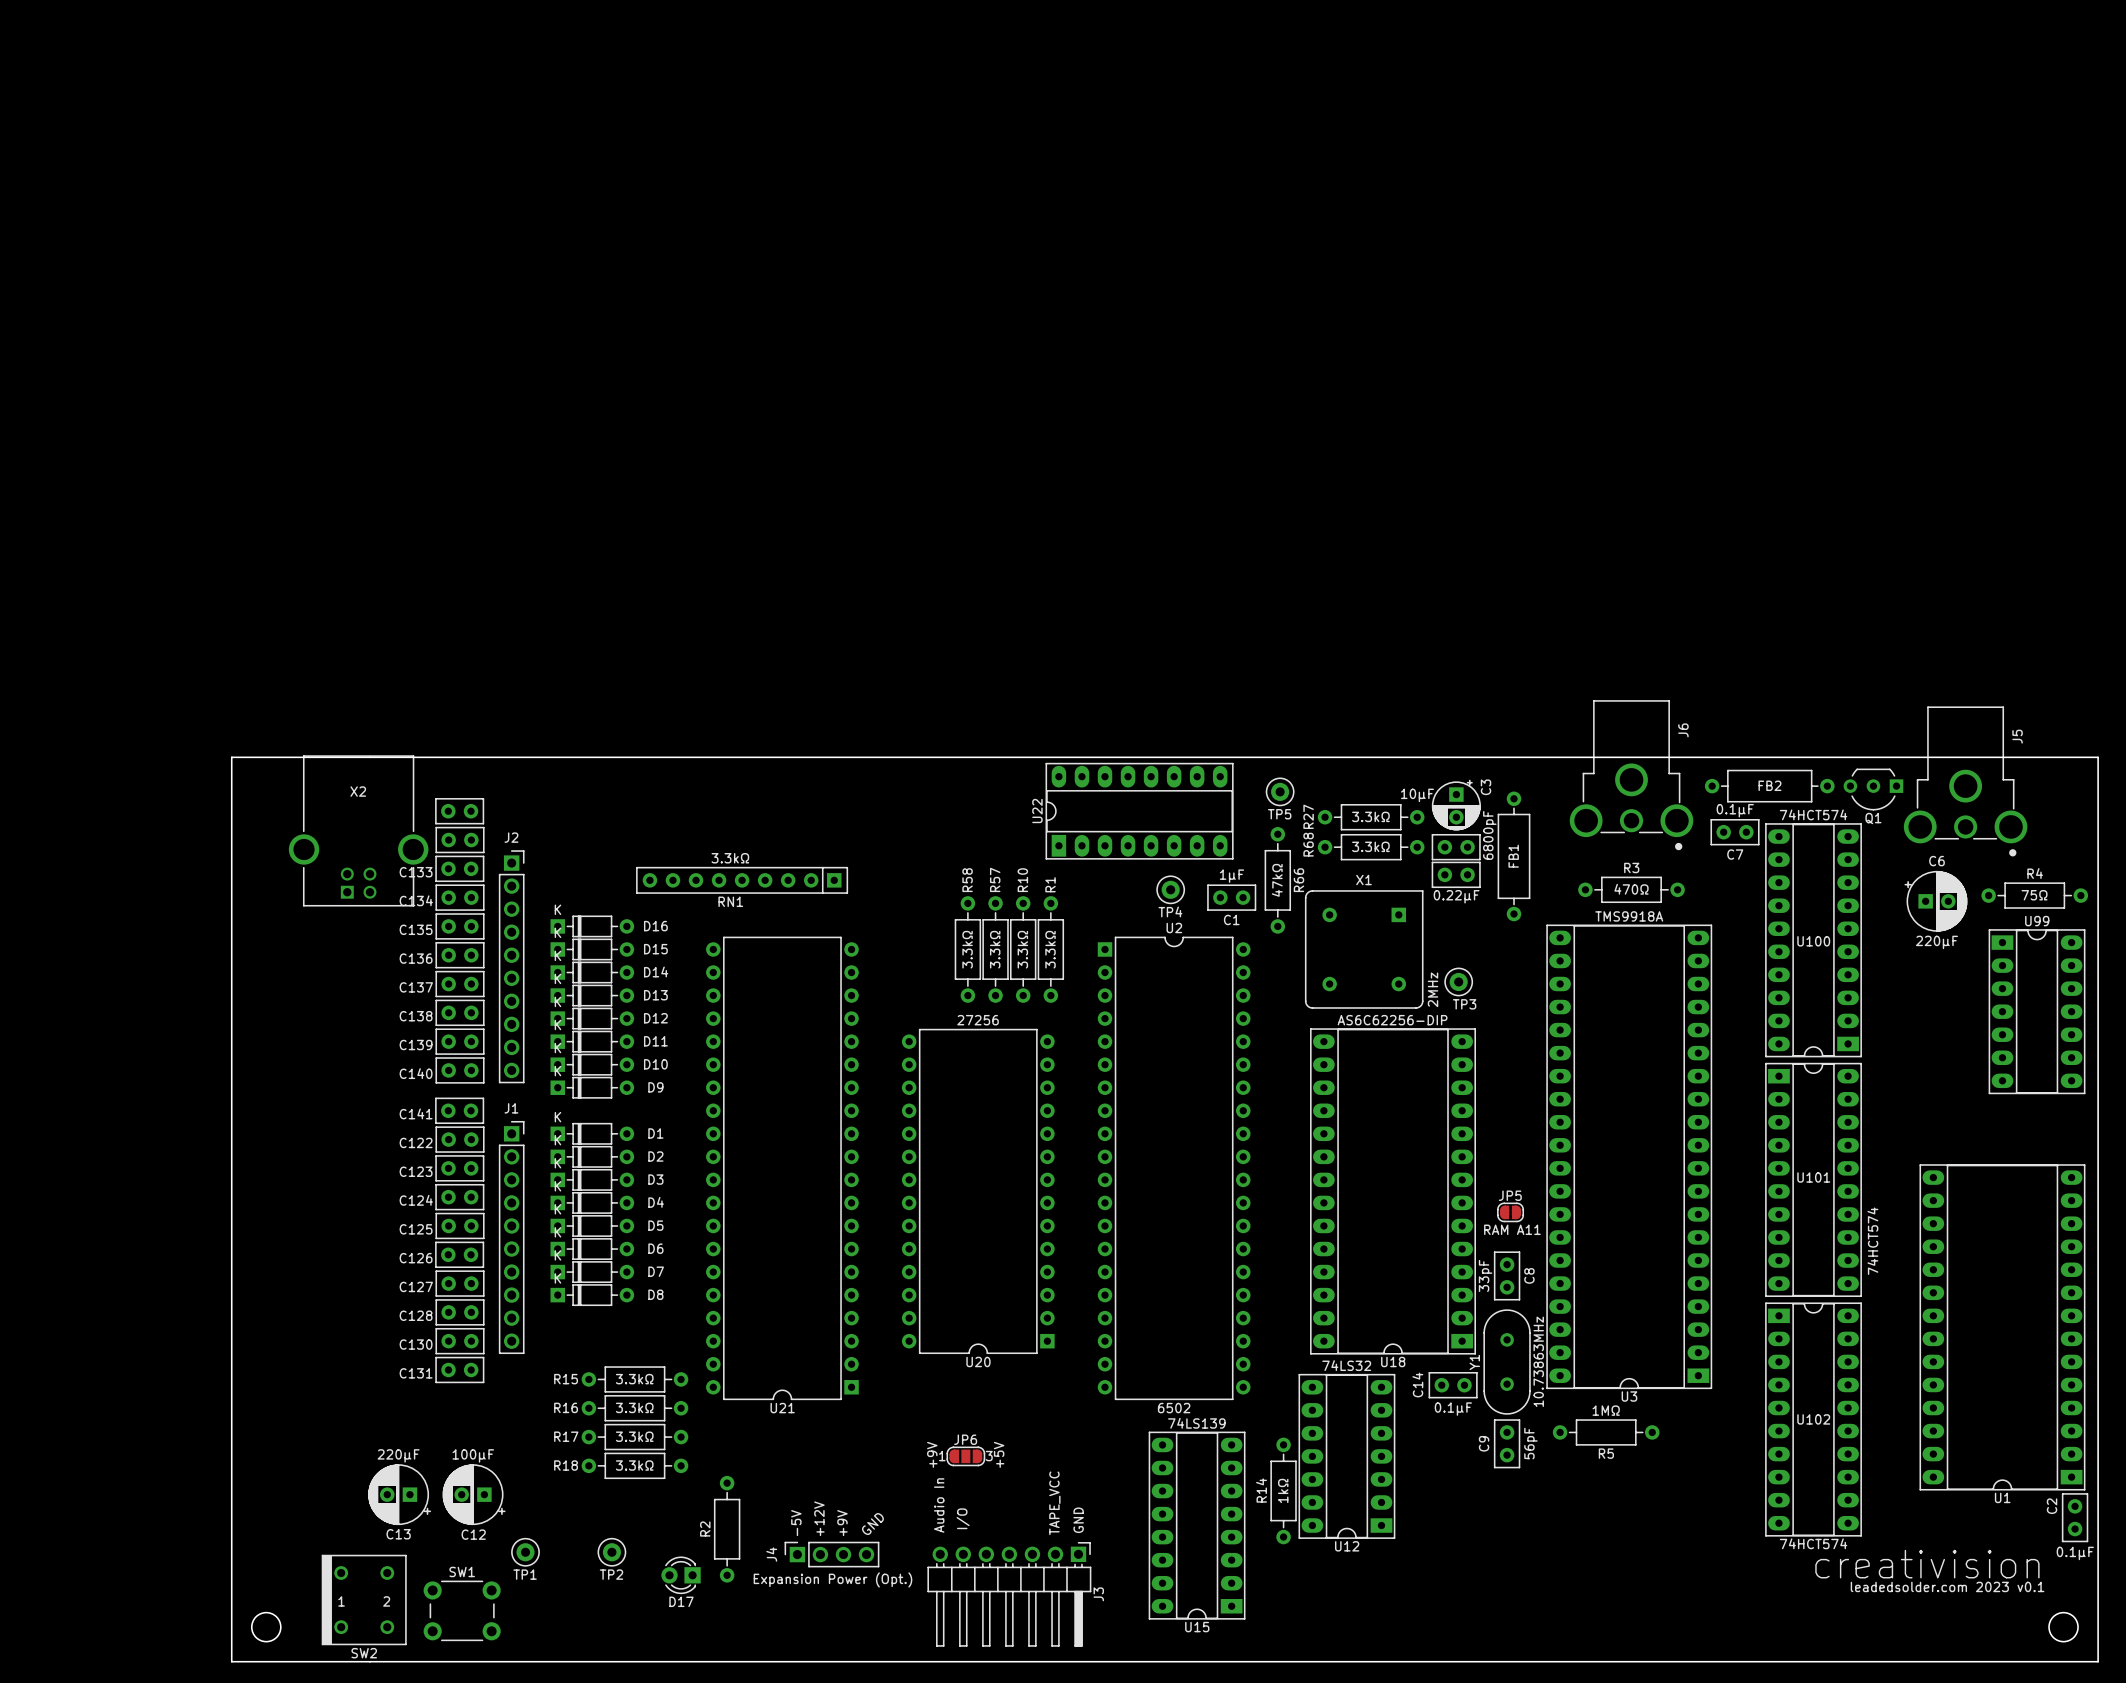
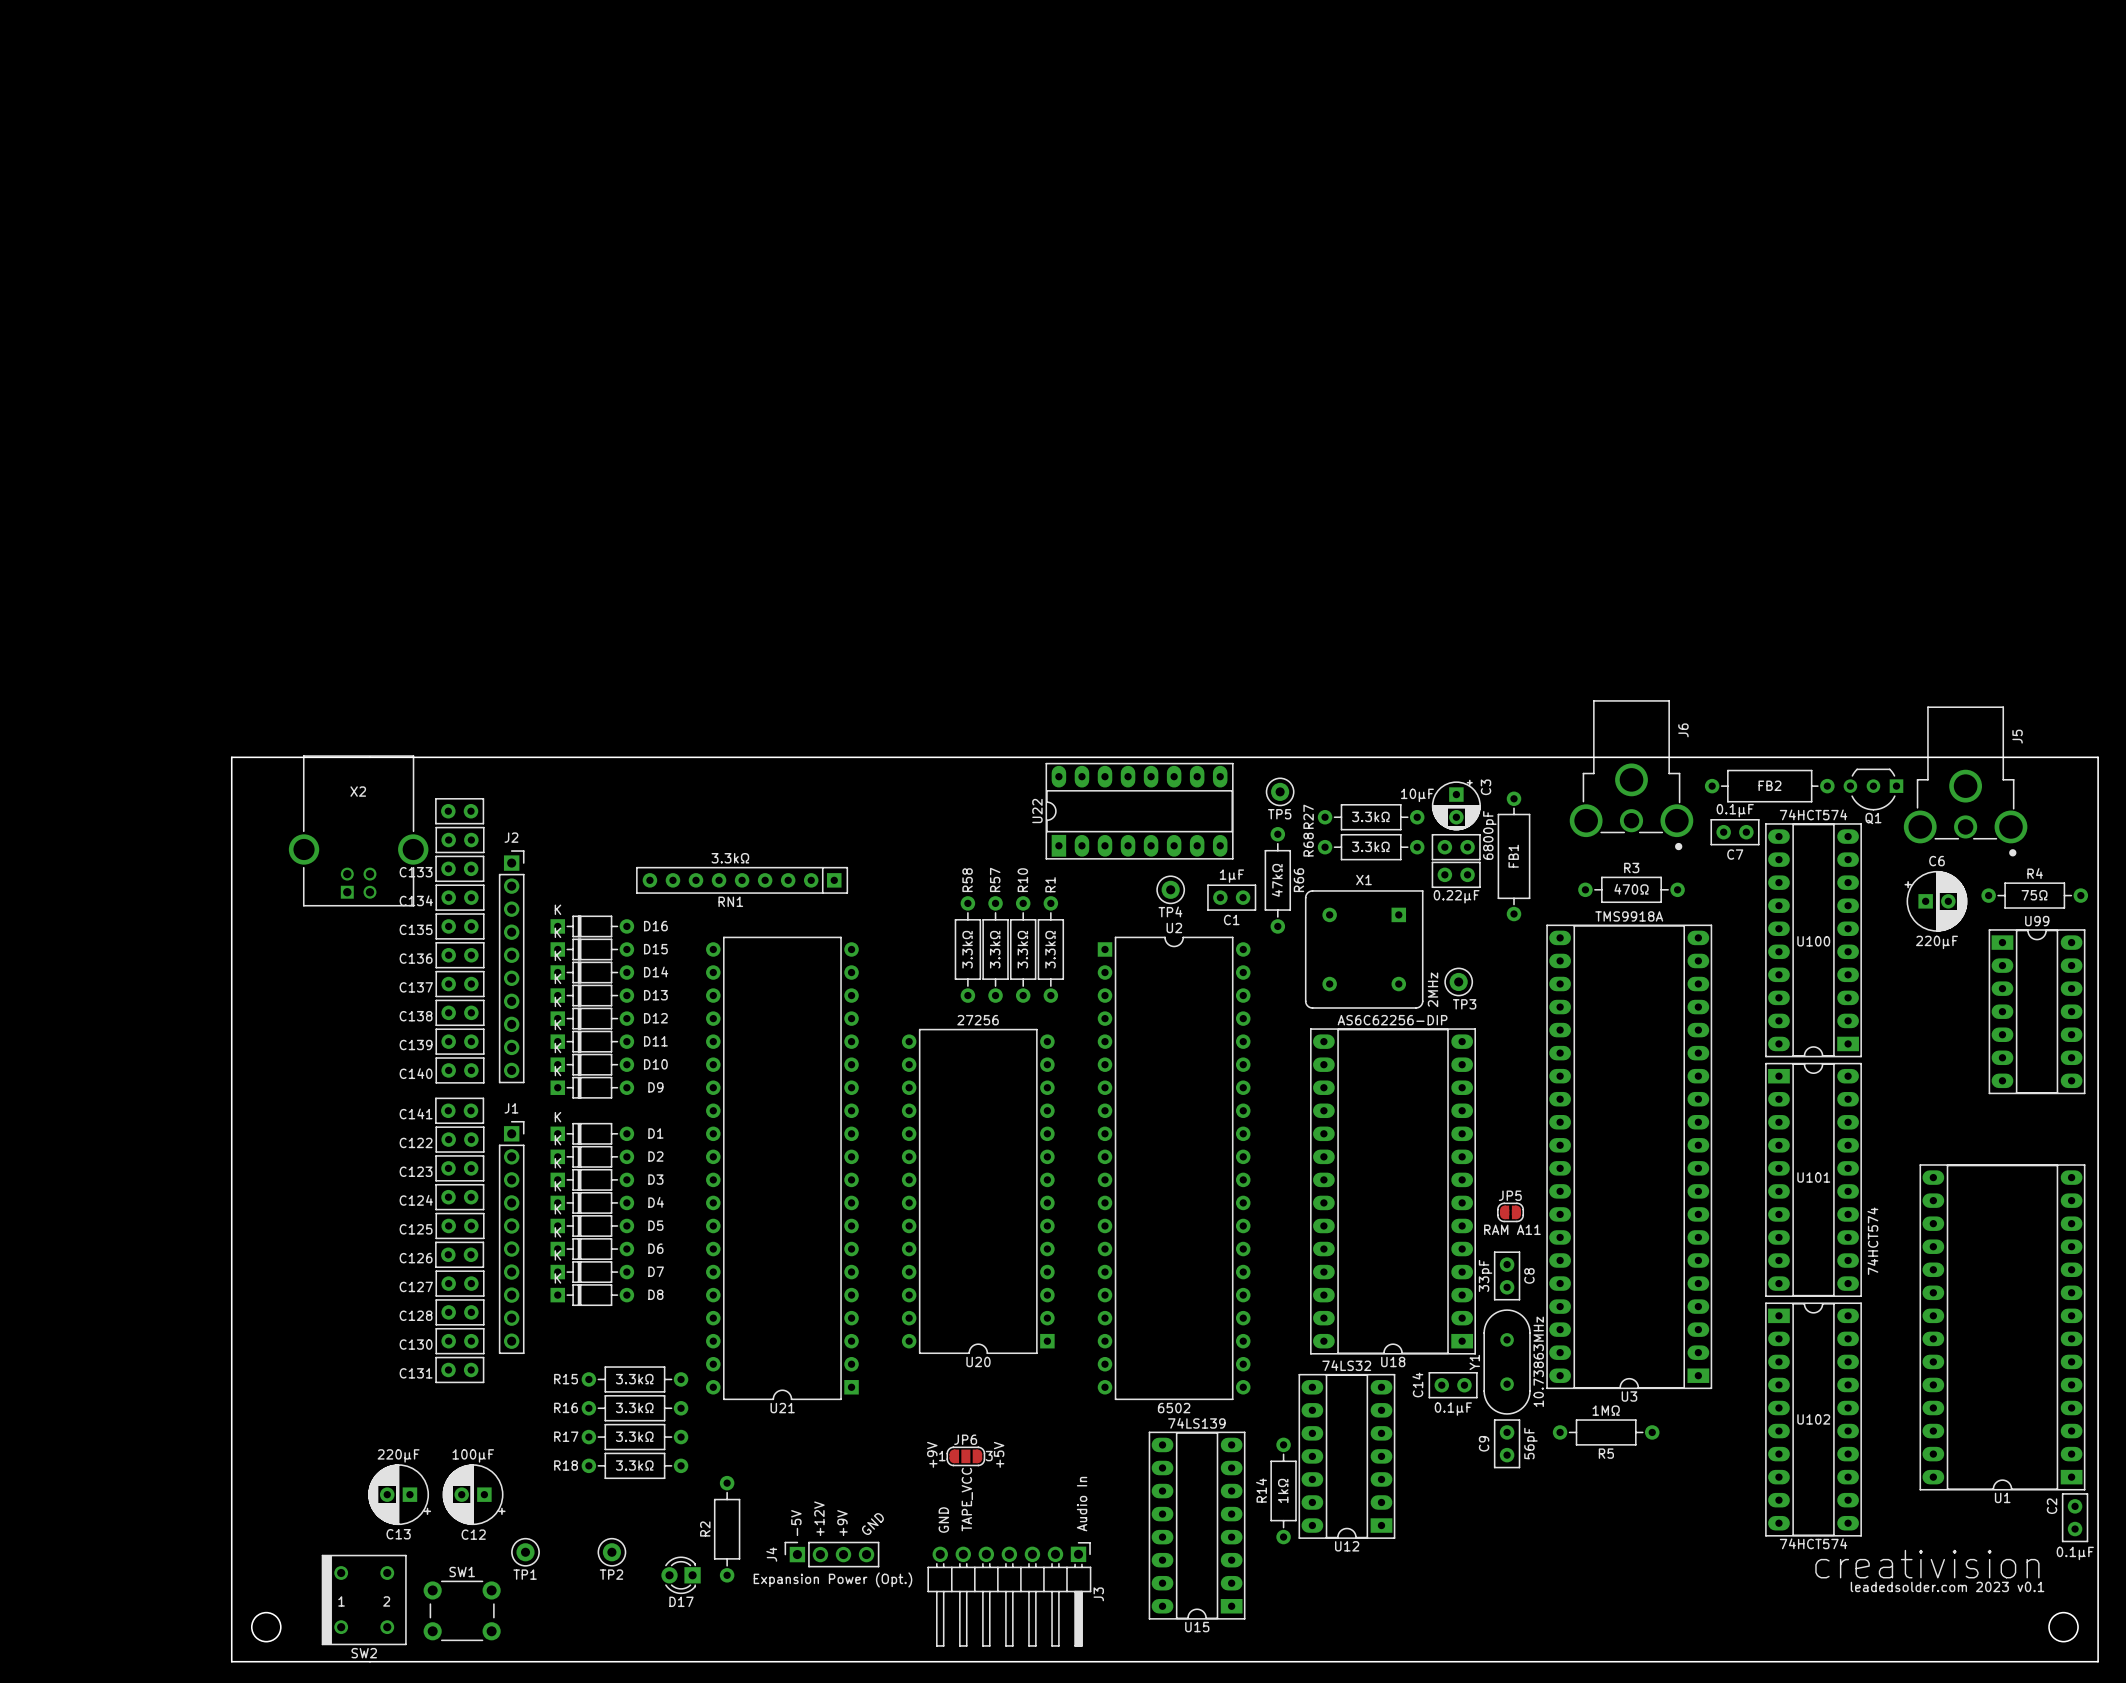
text: TAPE_VCC (1054, 1503) -> none
text: Audio In (939, 1505) -> GND (943, 1520)
text: I/O (963, 1518) -> TAPE_VCC (967, 1499)
text: GND (1078, 1520) -> Audio In (1082, 1504)

